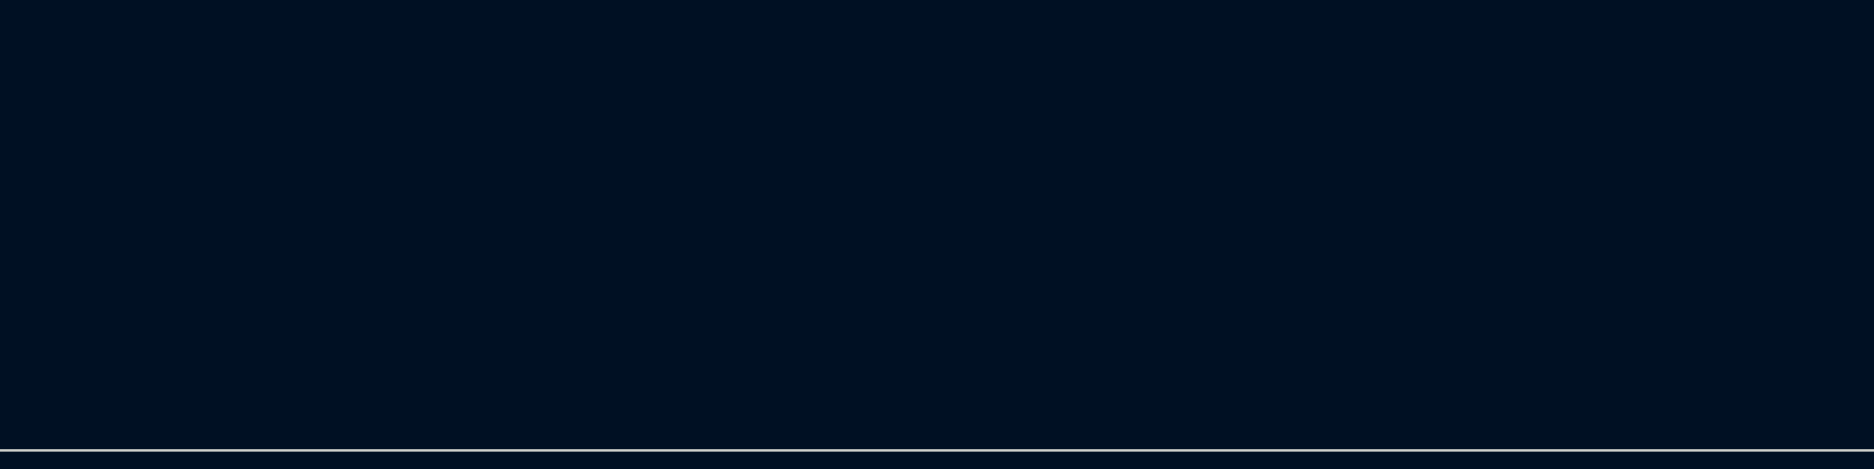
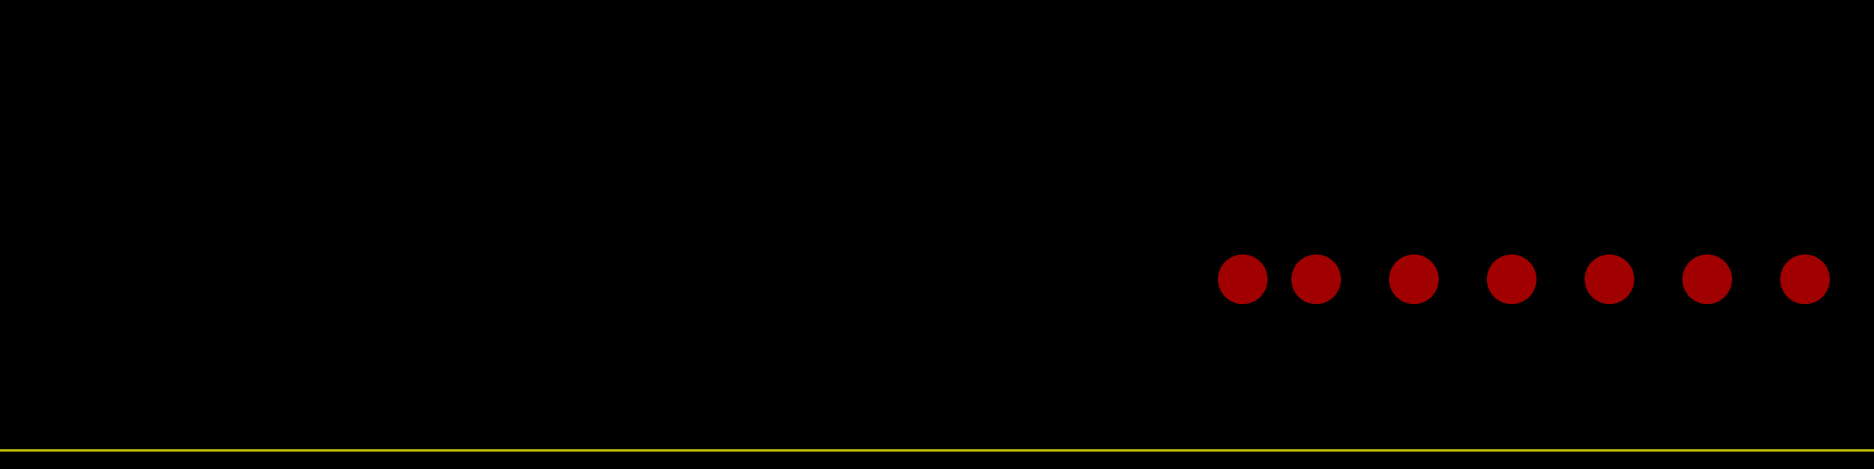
part: none -> (1242, 279)
part: none -> (1316, 279)
part: none -> (1413, 279)
part: none -> (1511, 279)
part: none -> (1609, 279)
part: none -> (1707, 279)
part: none -> (1804, 279)

